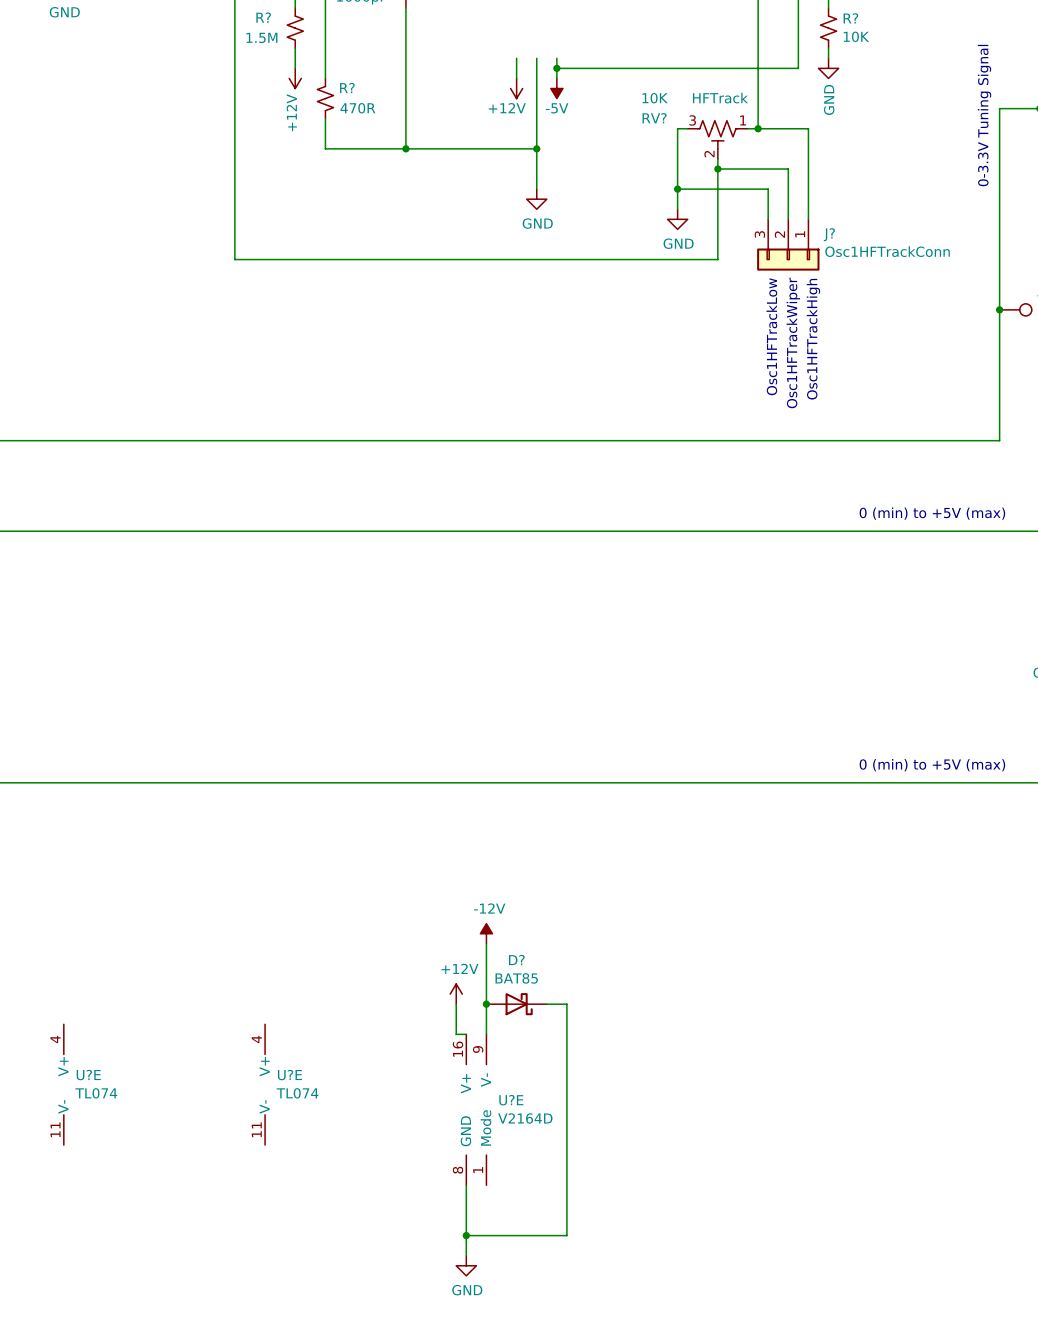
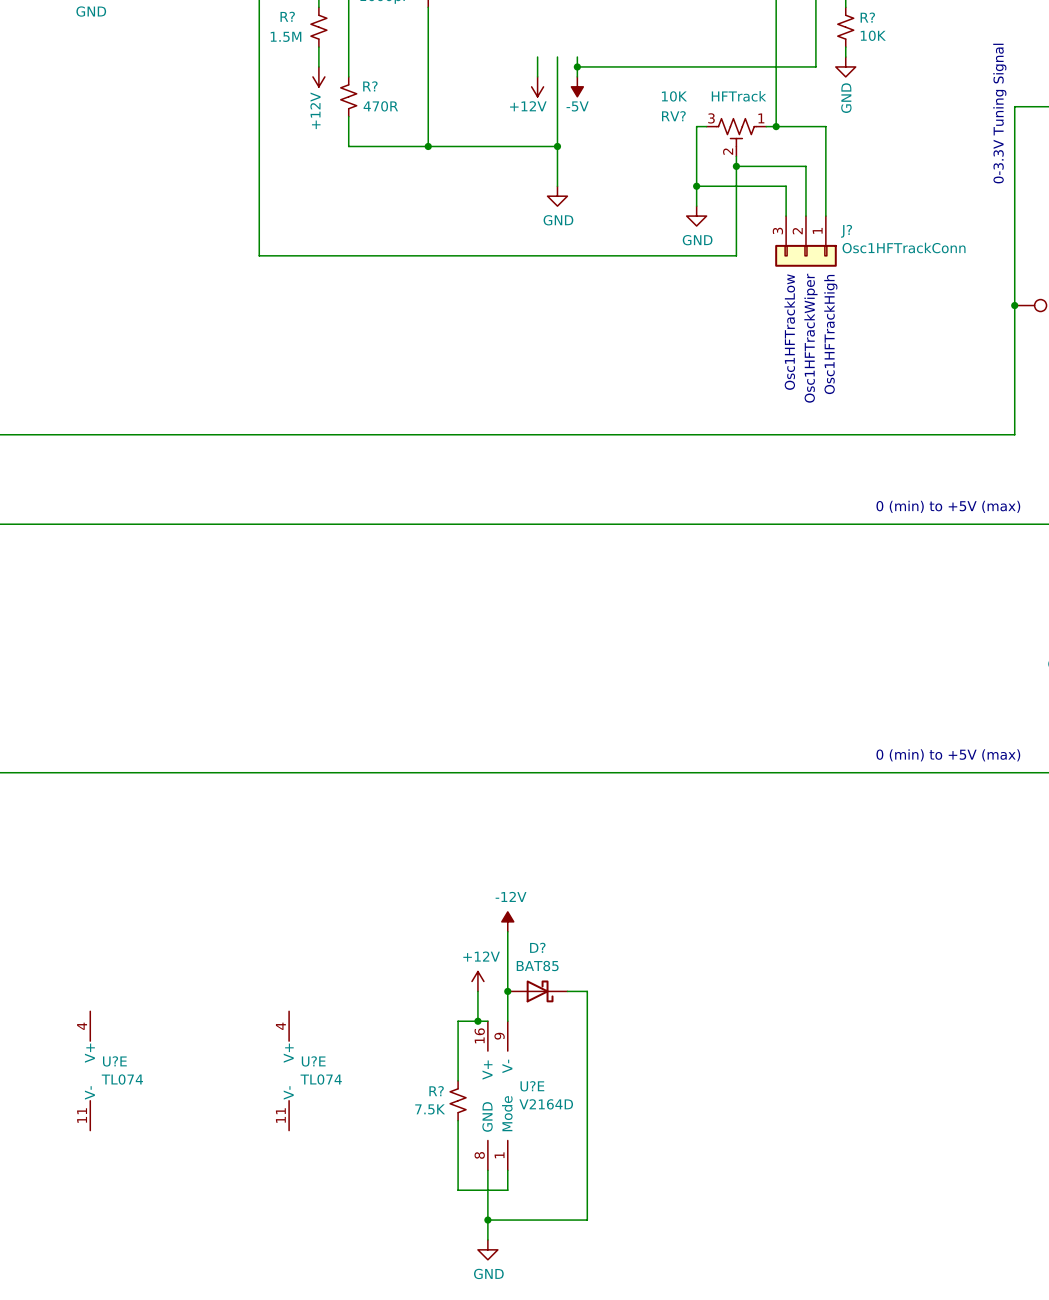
wire: none -> (477, 1021) (458, 1021) (458, 1080)
junction: none -> (477, 1021)
R?: none -> 7.5K (458, 1100)
wire: none -> (458, 1120) (458, 1190) (507, 1190) (507, 1170)

